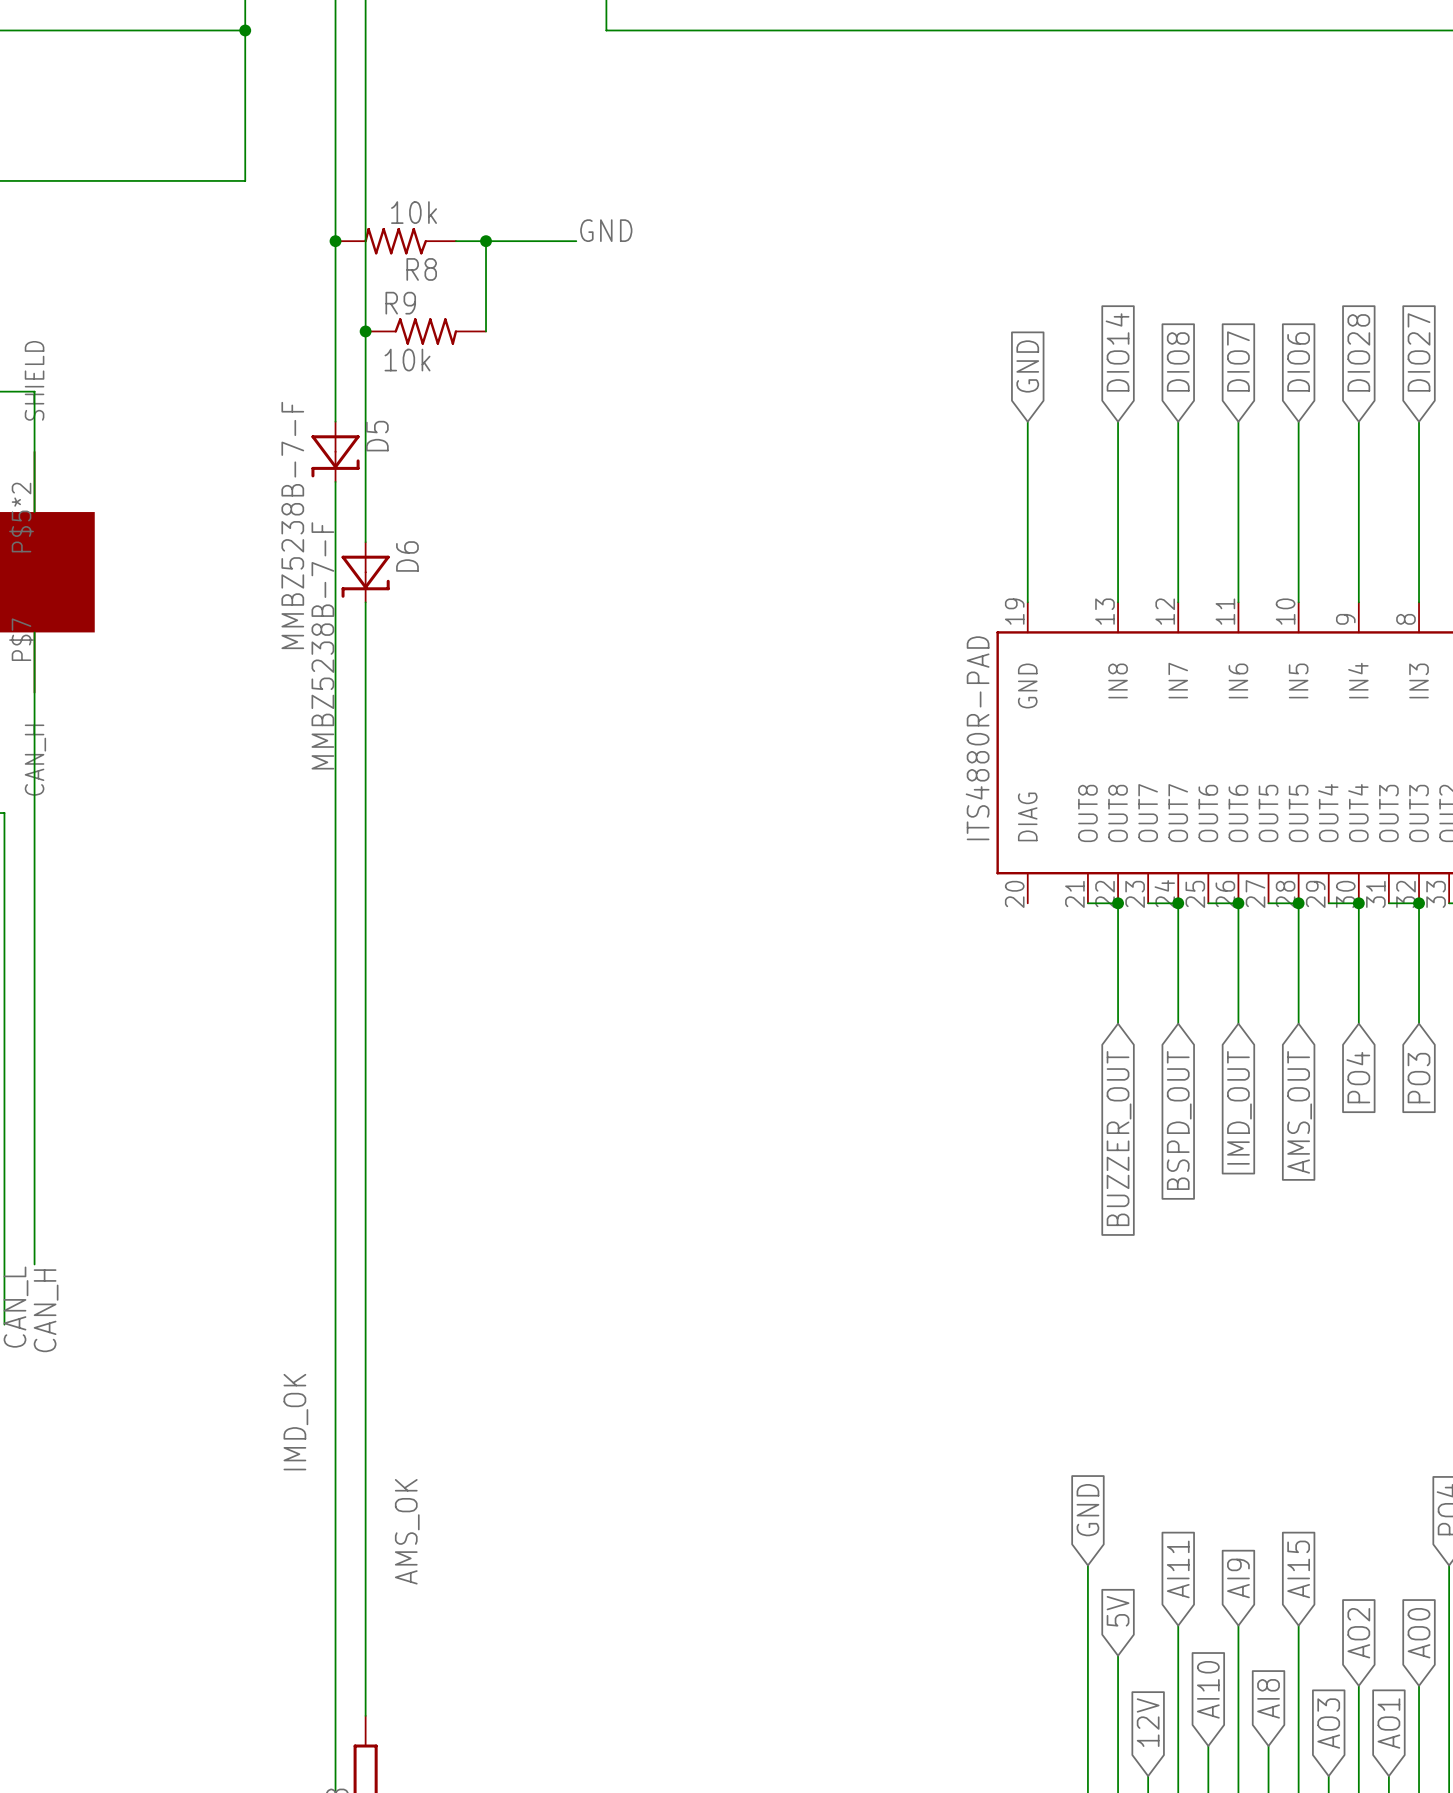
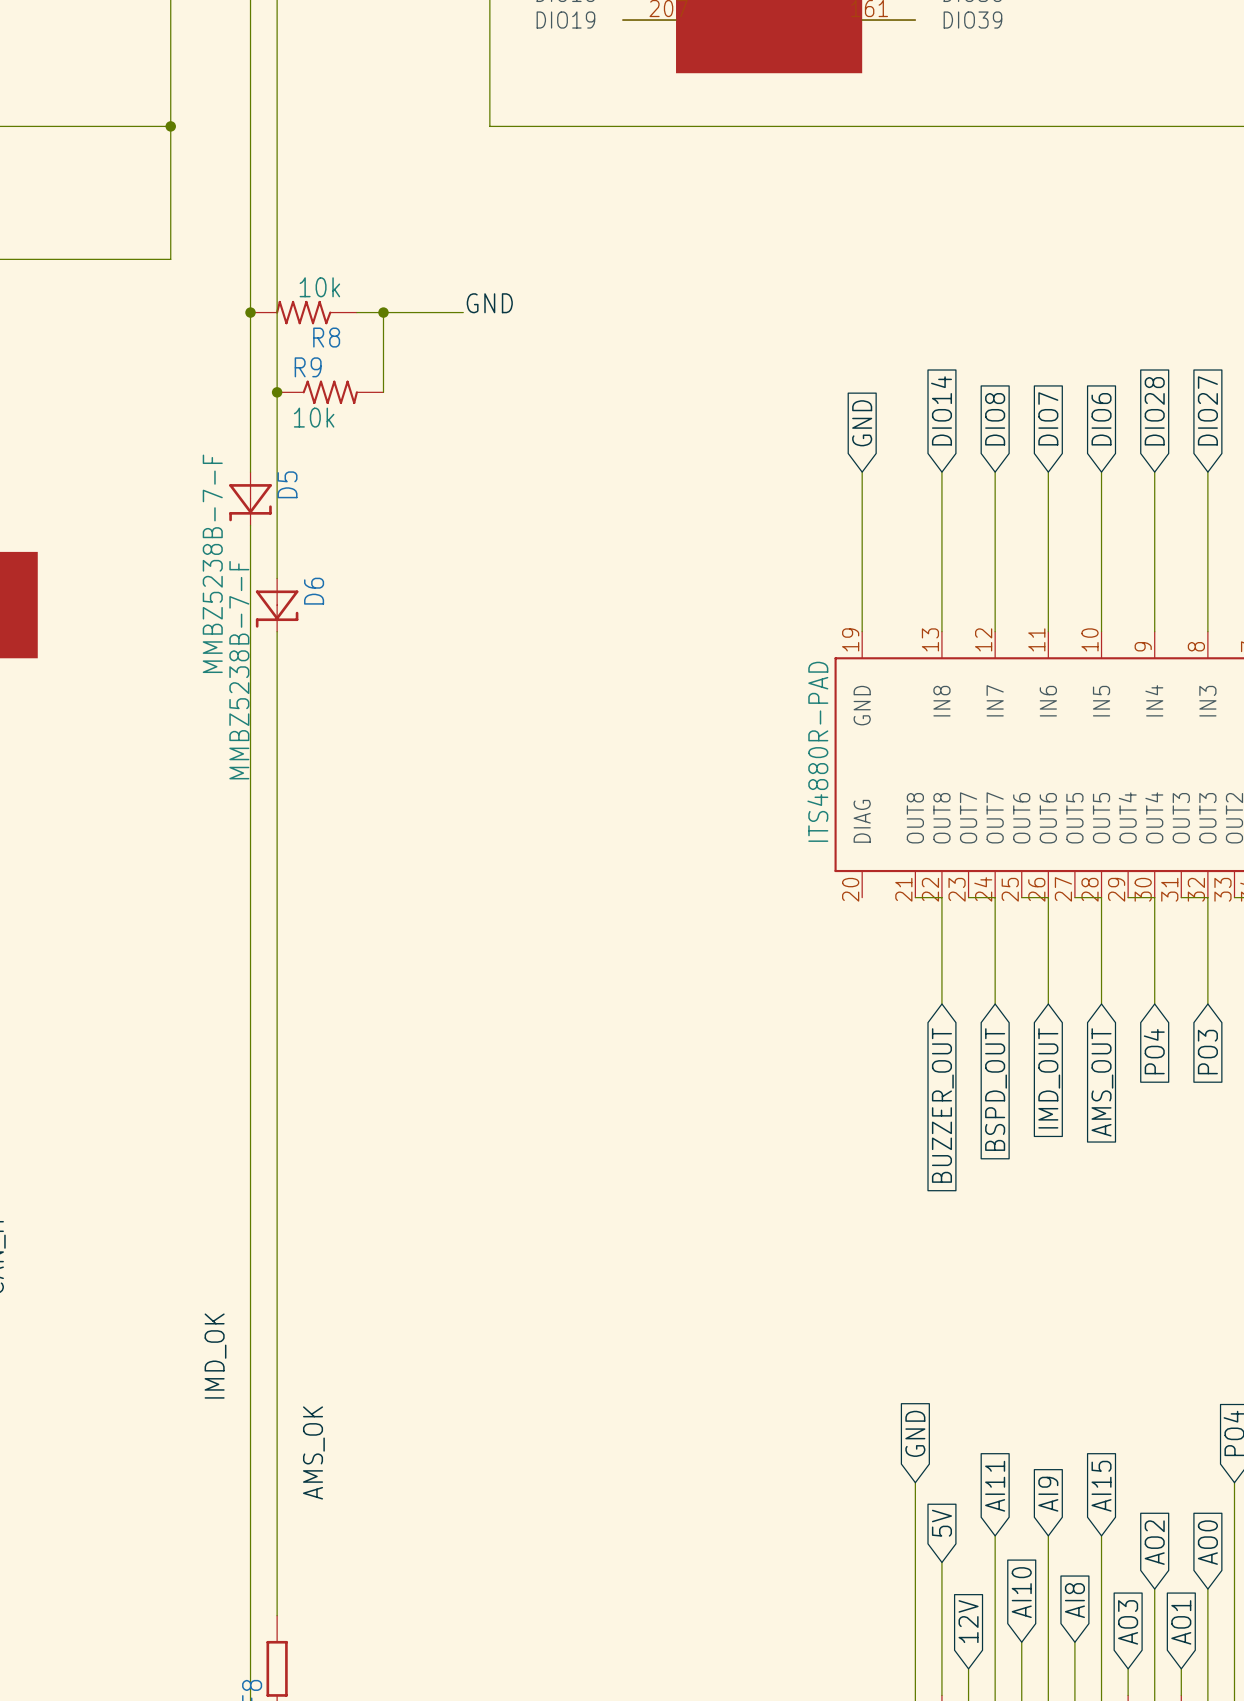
junction: (1118, 903) -> none
junction: (1178, 903) -> none
junction: (1238, 903) -> none
junction: (1298, 903) -> none
junction: (1358, 903) -> none
junction: (1419, 903) -> none

